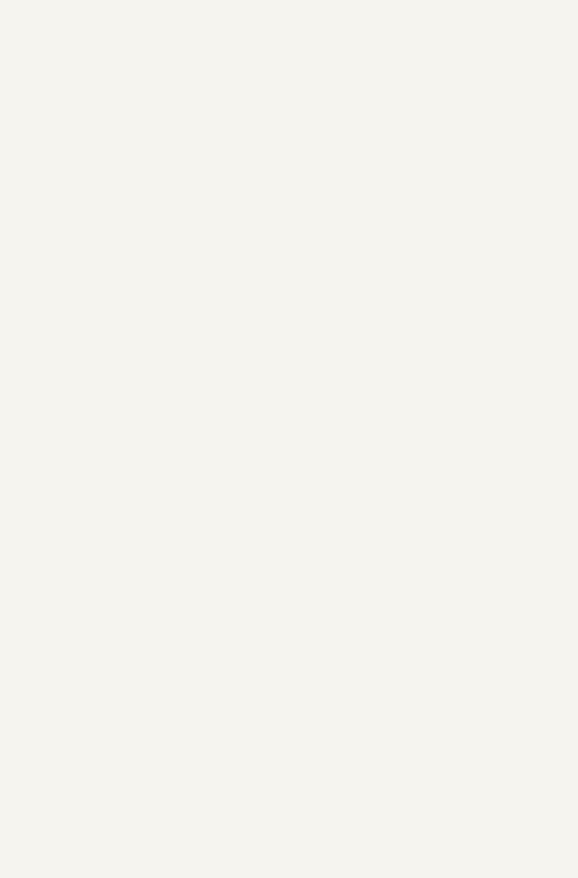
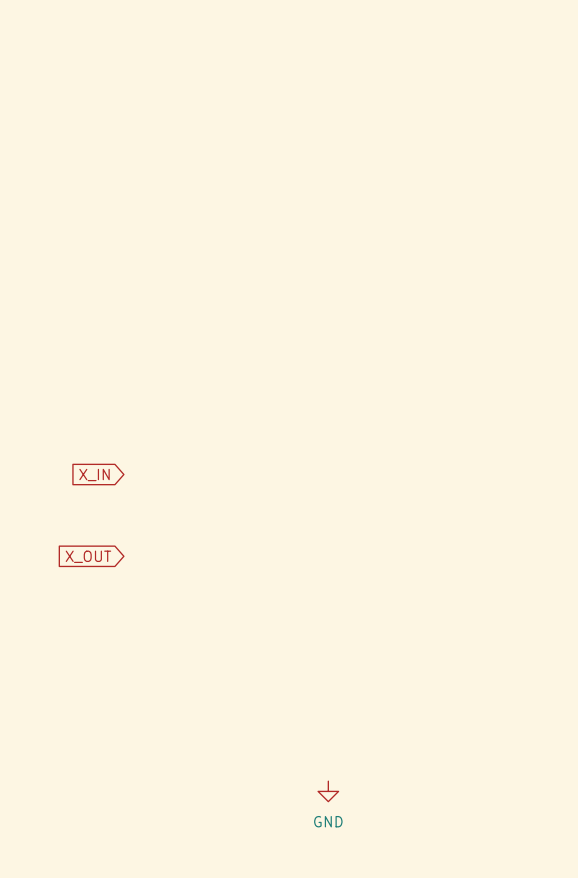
global label: none -> X_IN (94, 475)
global label: none -> X_OUT (88, 556)
power symbol: none -> GND (328, 791)

